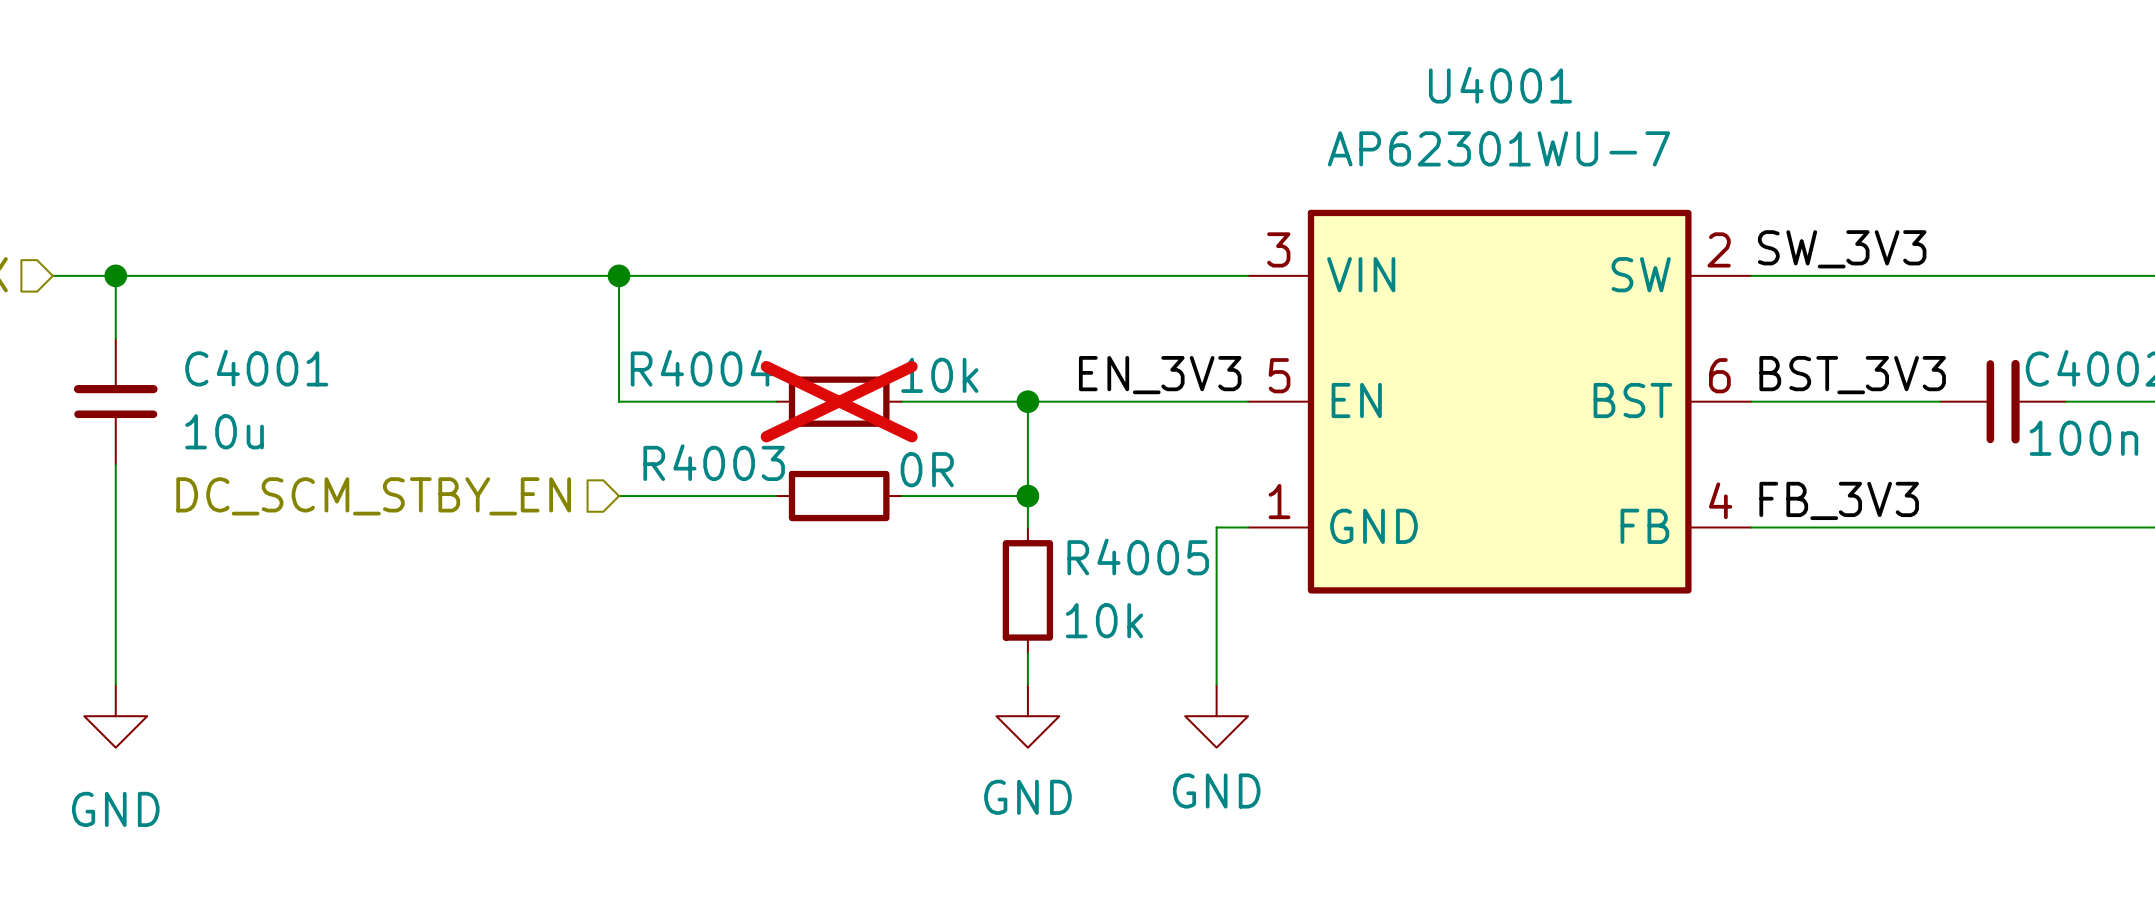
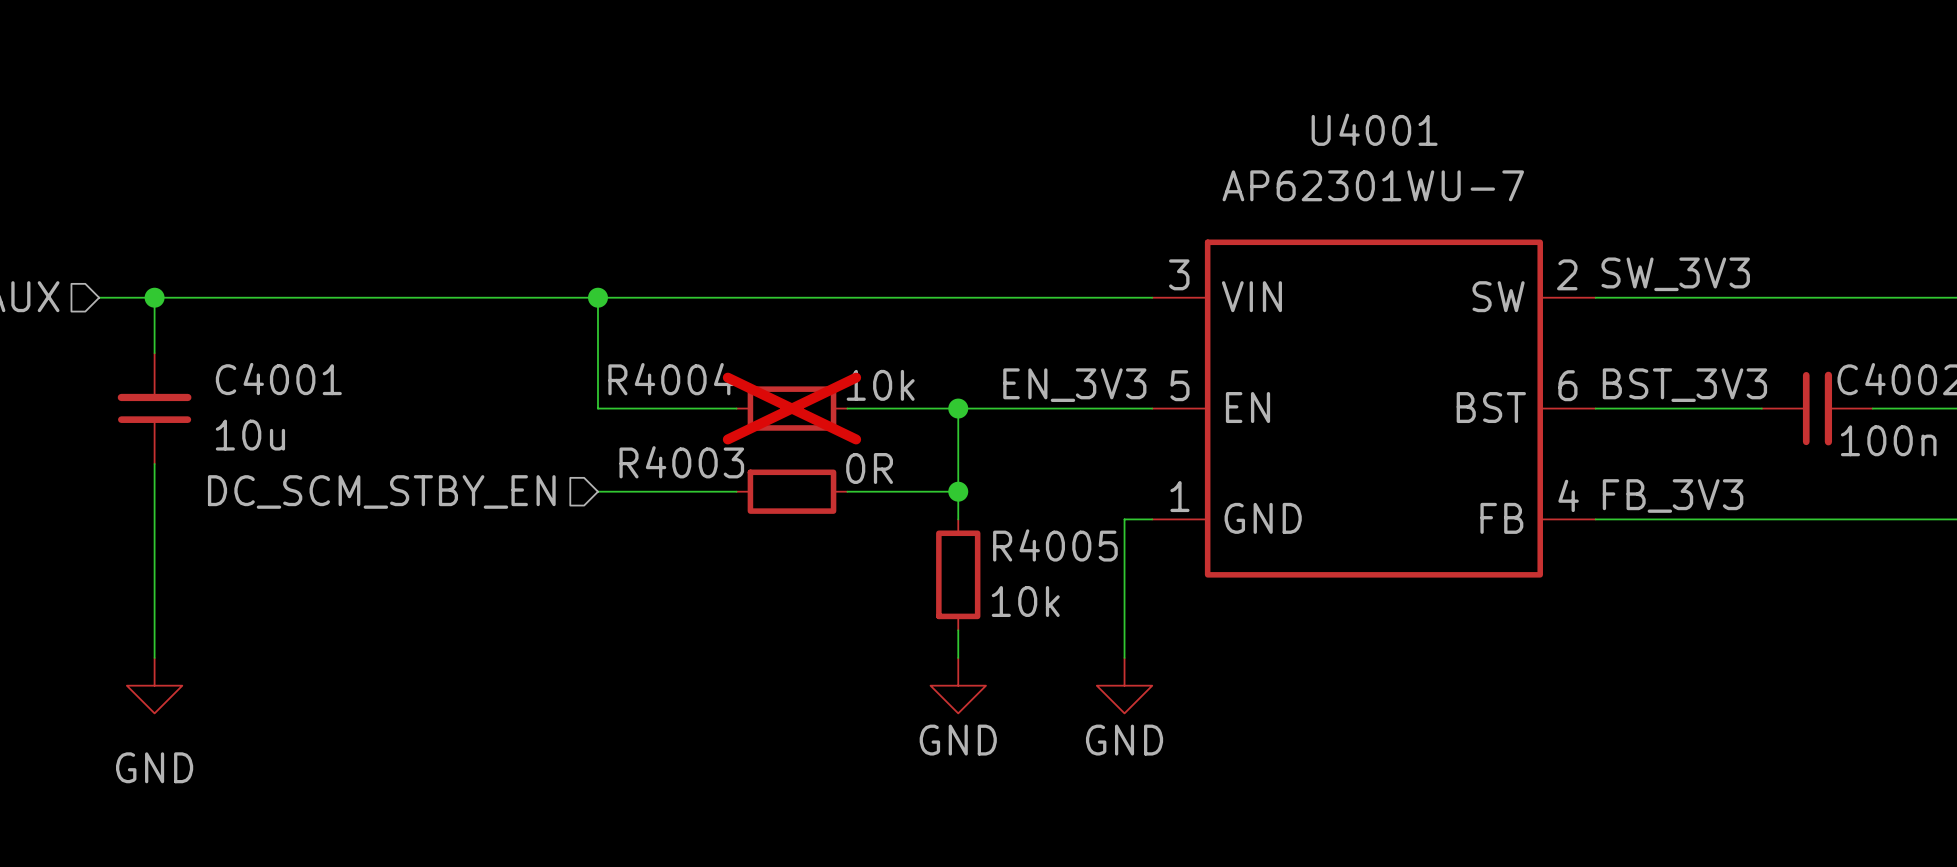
power symbol text position: GND (1216, 790) -> GND (1124, 740)
power symbol text position: GND (1027, 797) -> GND (958, 740)

